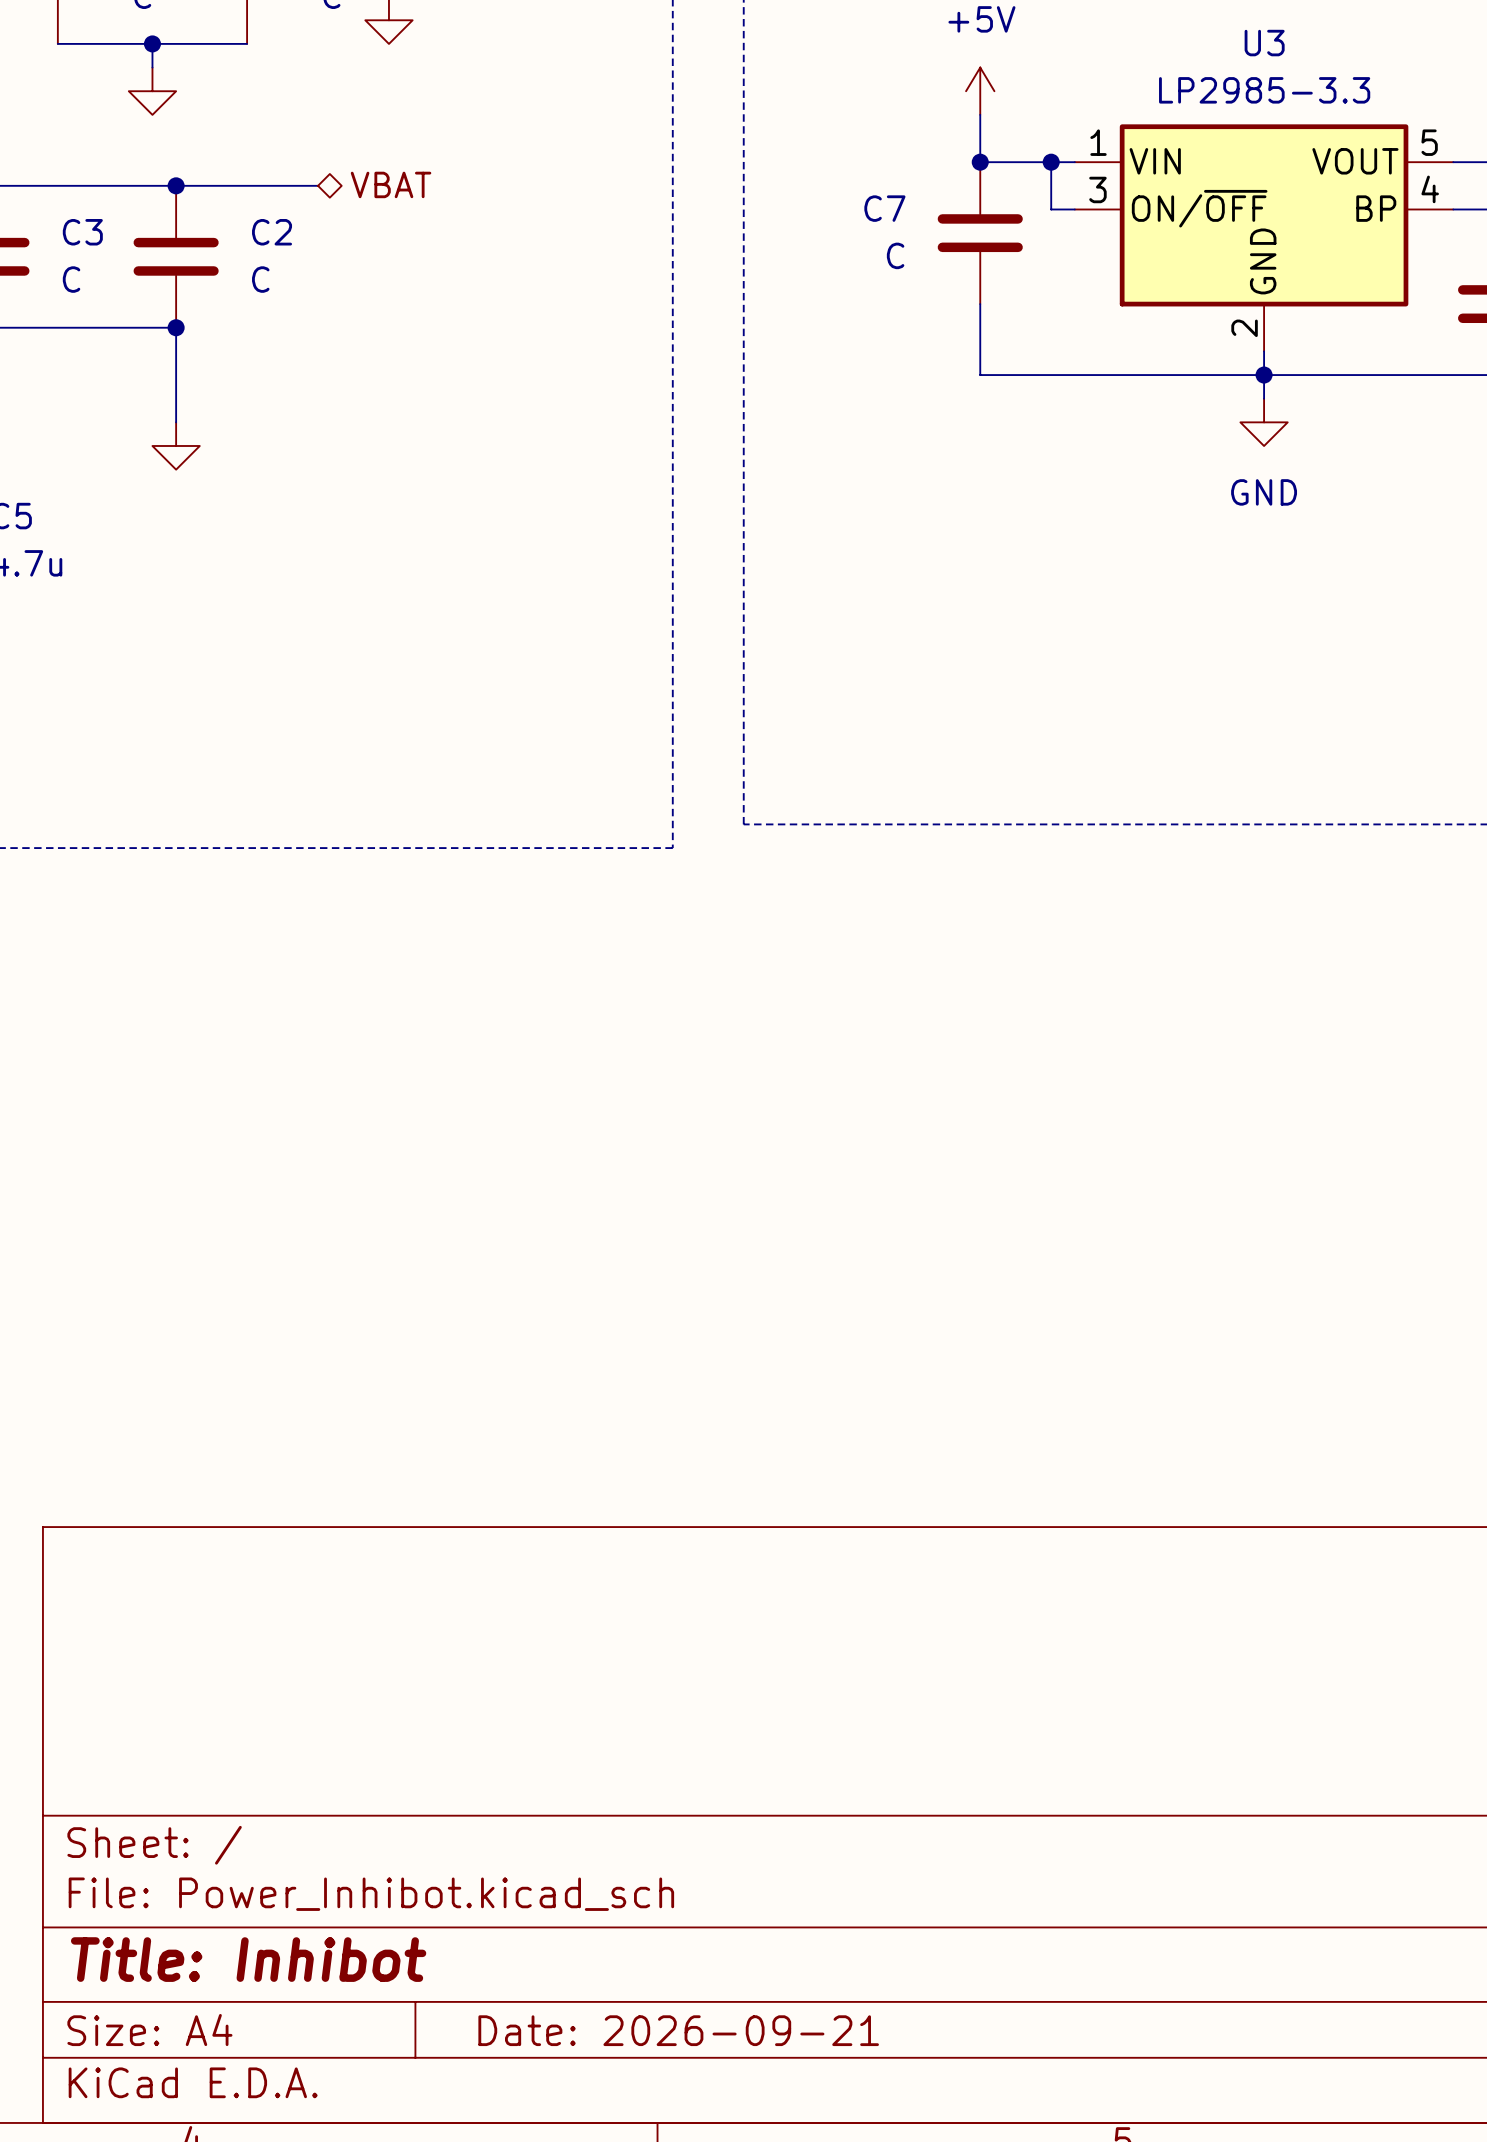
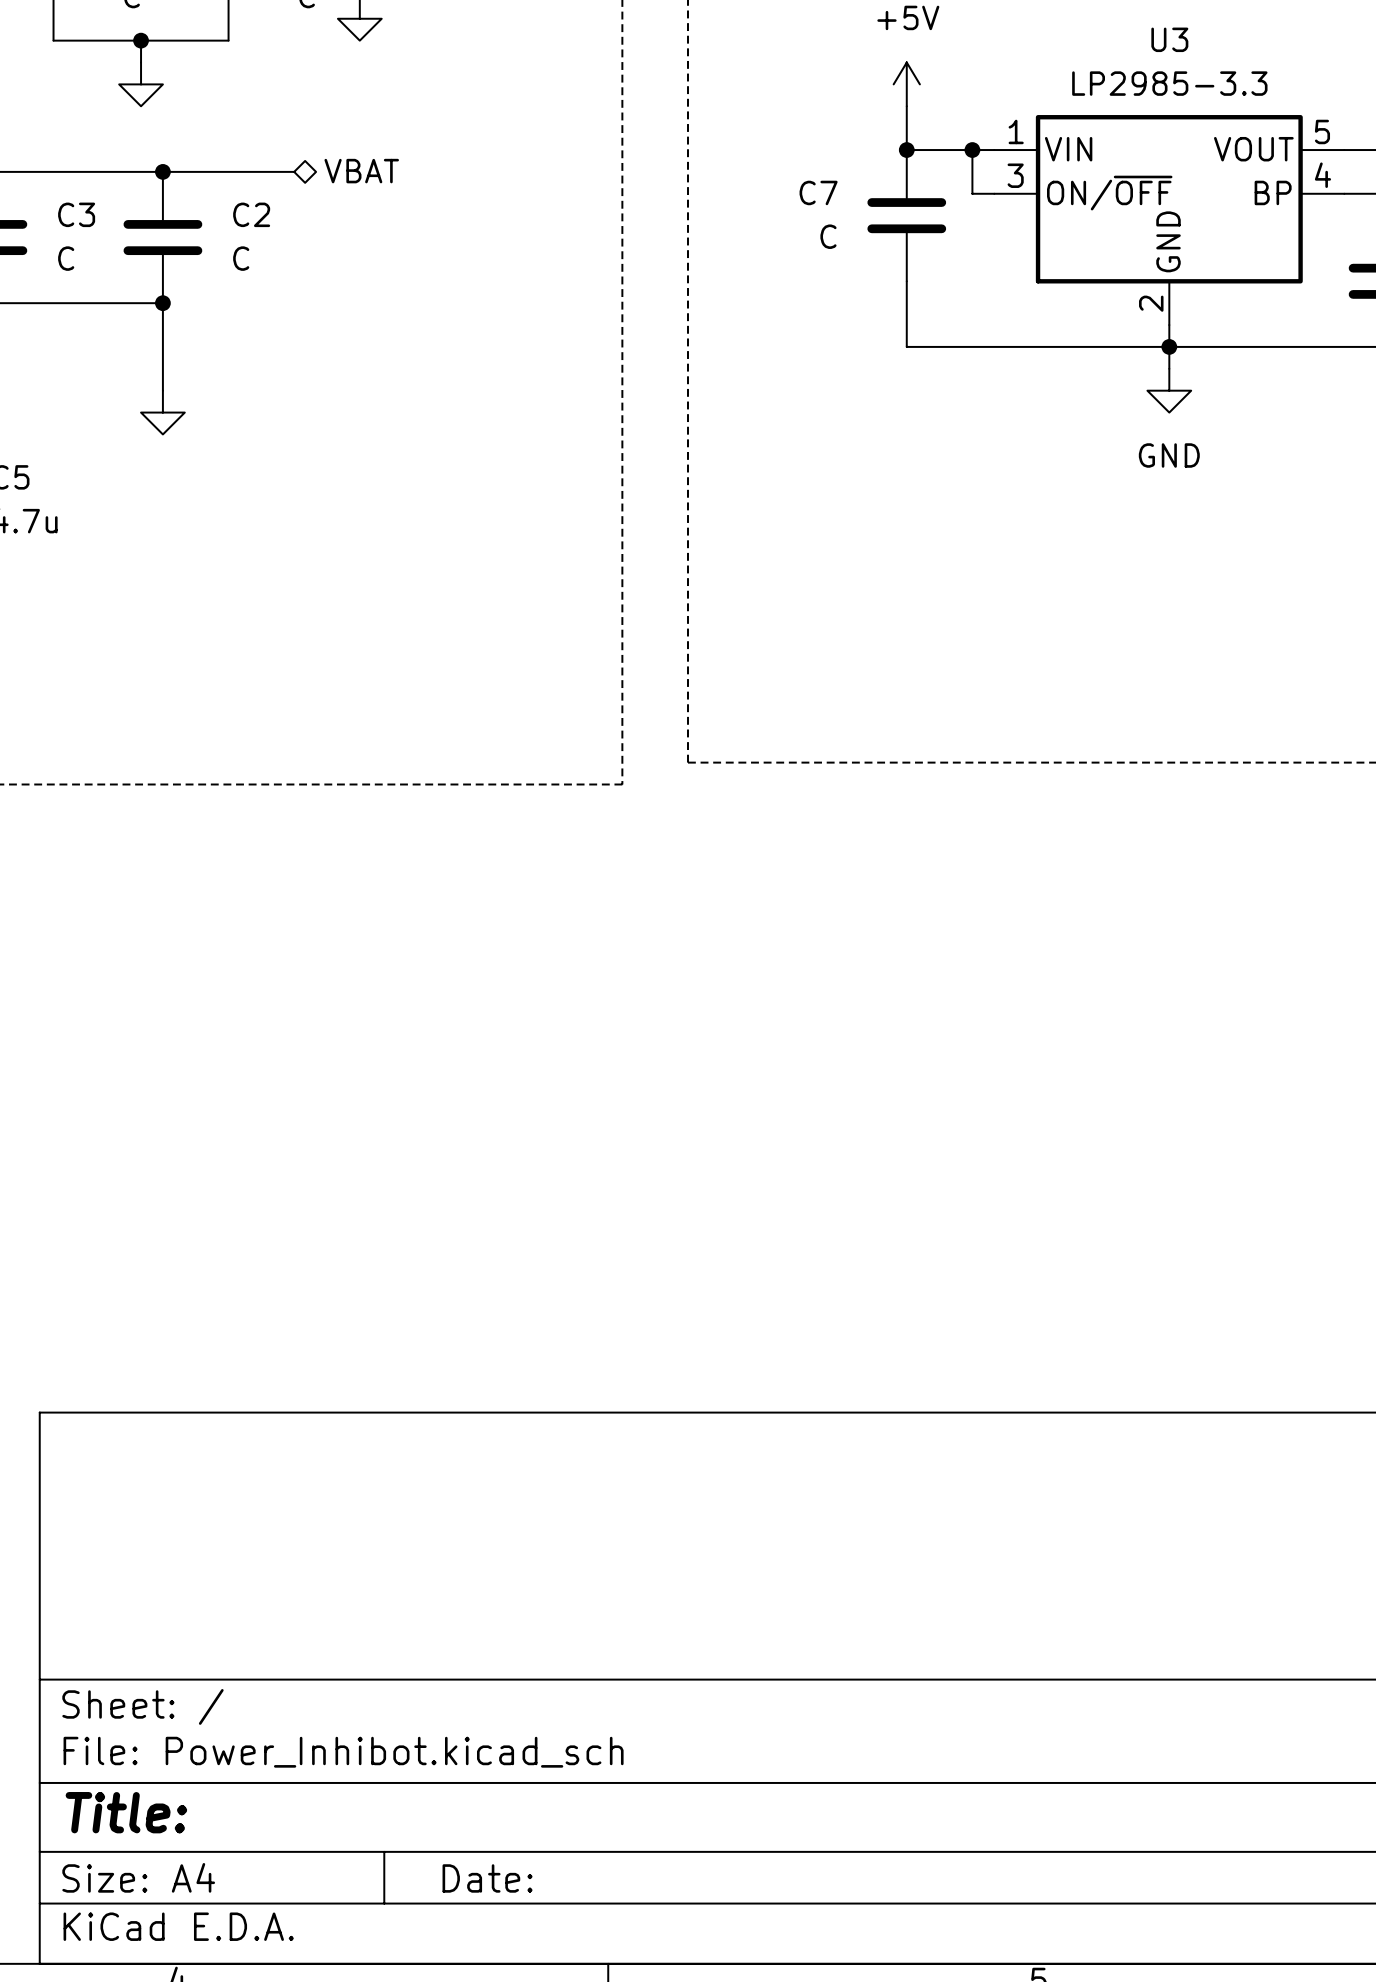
title block: Title: Inhibot (248, 1959) -> Title: (126, 1812)
title block: Date: 2026-09-21 (678, 2030) -> Date: (487, 1878)

